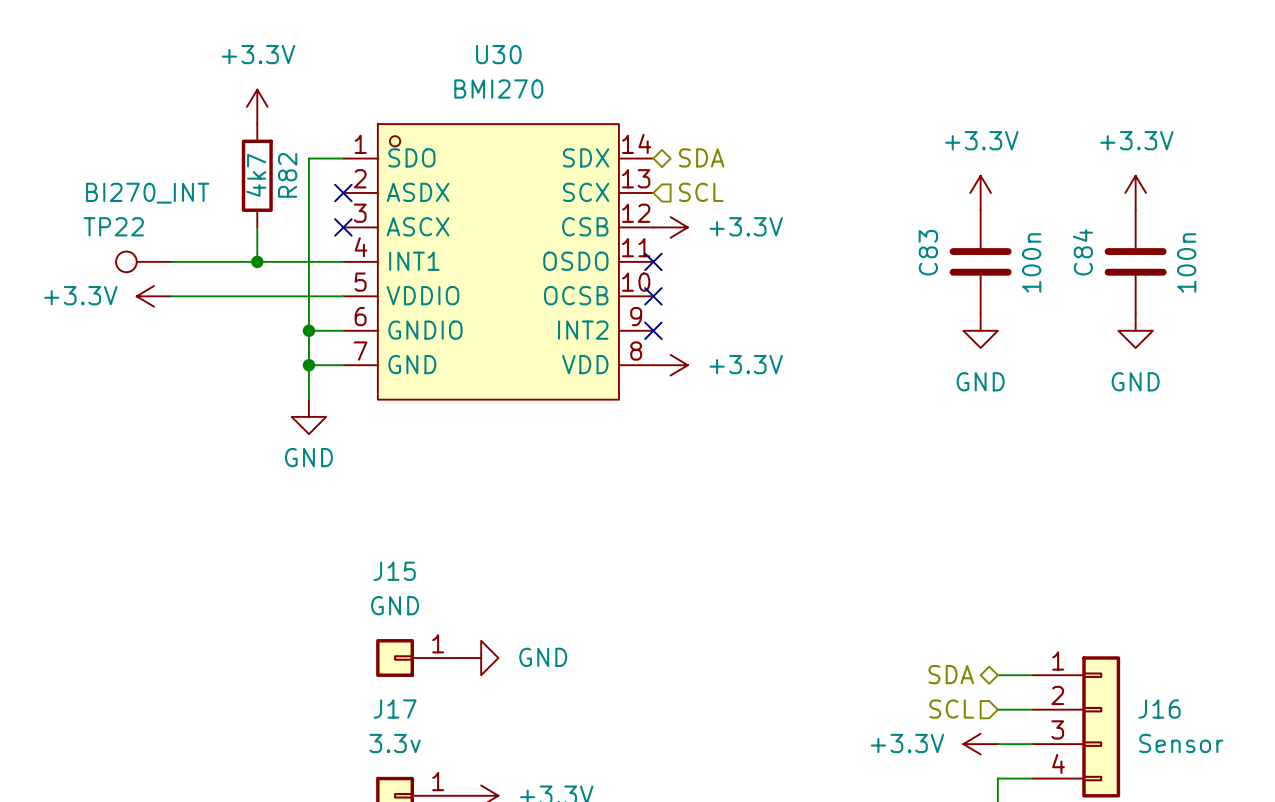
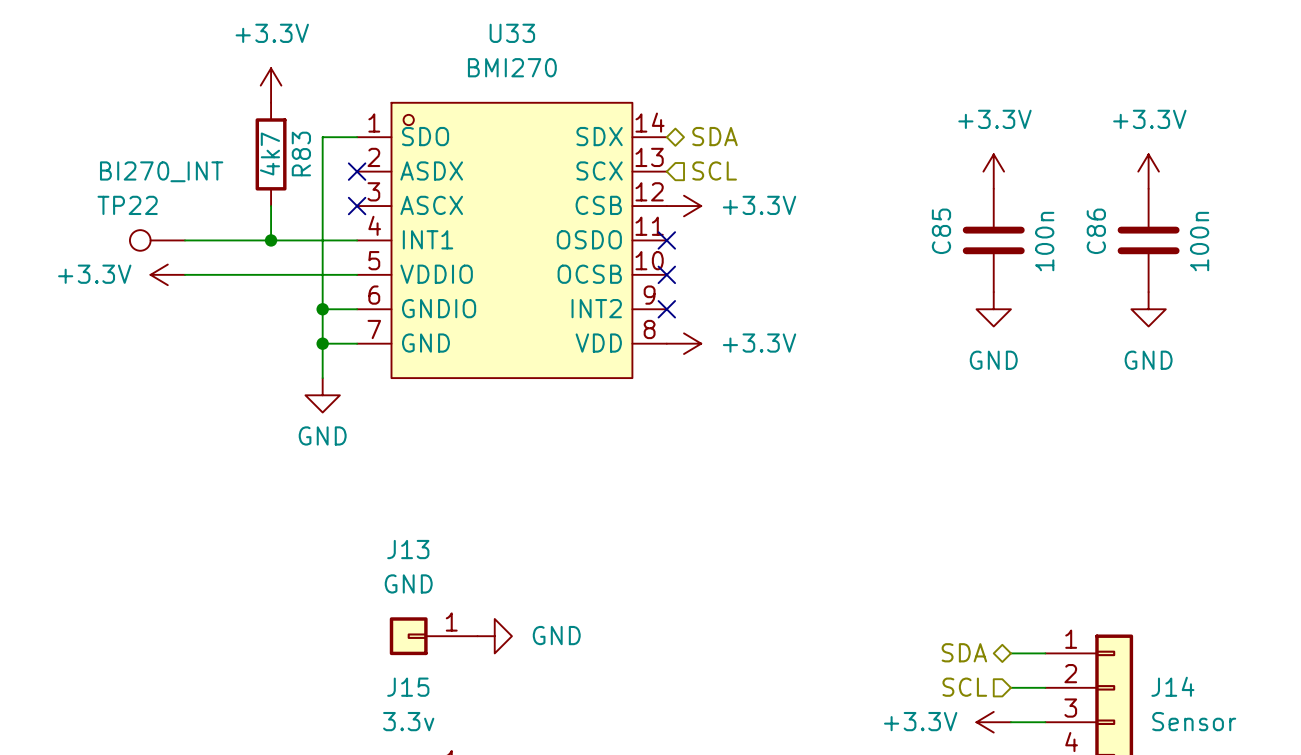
U30 name: U30 (498, 54) -> U33 (512, 33)
R82 name: R82 (287, 175) -> R83 (301, 154)
C83 name: C83 (928, 252) -> C85 (941, 231)
C84 name: C84 (1082, 252) -> C86 (1096, 231)
J15 name: J15 (394, 571) -> J13 (408, 549)
J17 name: J17 (395, 709) -> J15 (408, 687)
J16 name: J16 (1159, 709) -> J14 (1172, 686)

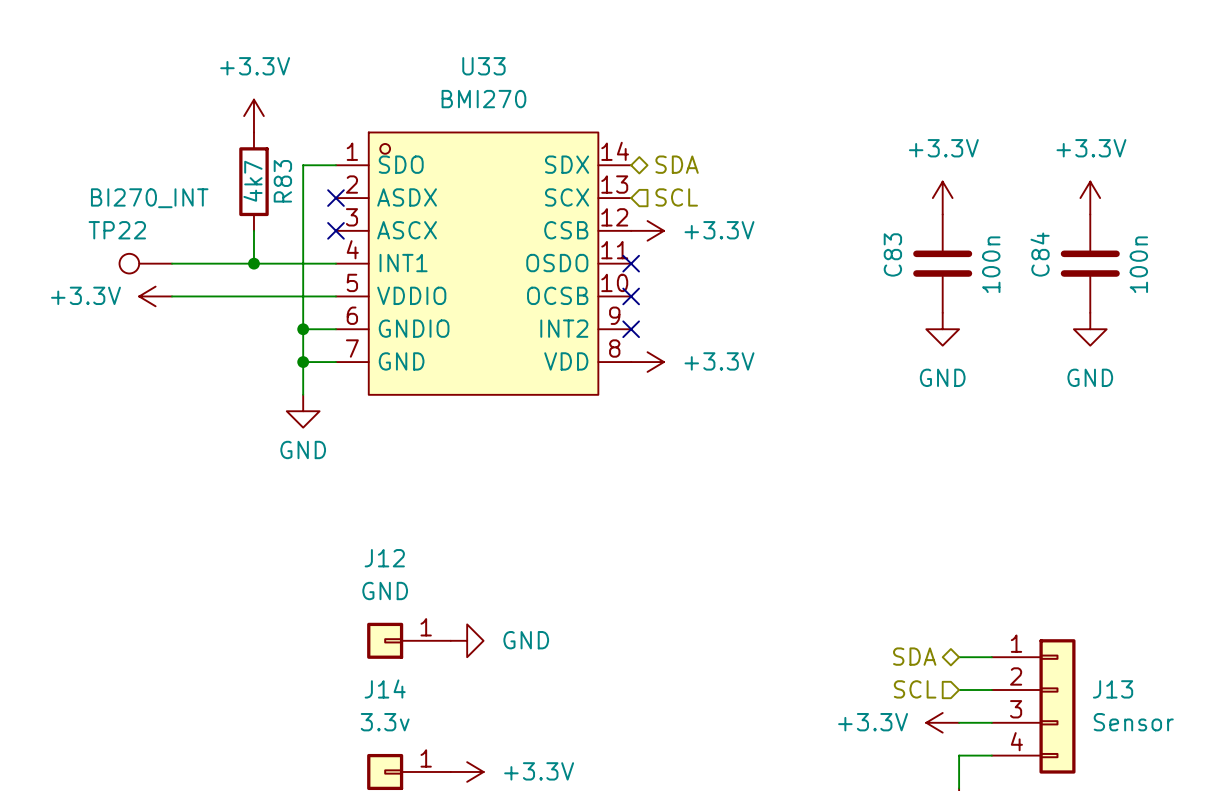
C85 name: C85 (941, 231) -> C83 (892, 254)
C86 name: C86 (1096, 231) -> C84 (1040, 254)
J13 name: J13 (408, 549) -> J12 (384, 558)
J14 name: J14 (1172, 686) -> J13 (1113, 689)
J15 name: J15 (408, 687) -> J14 (385, 689)

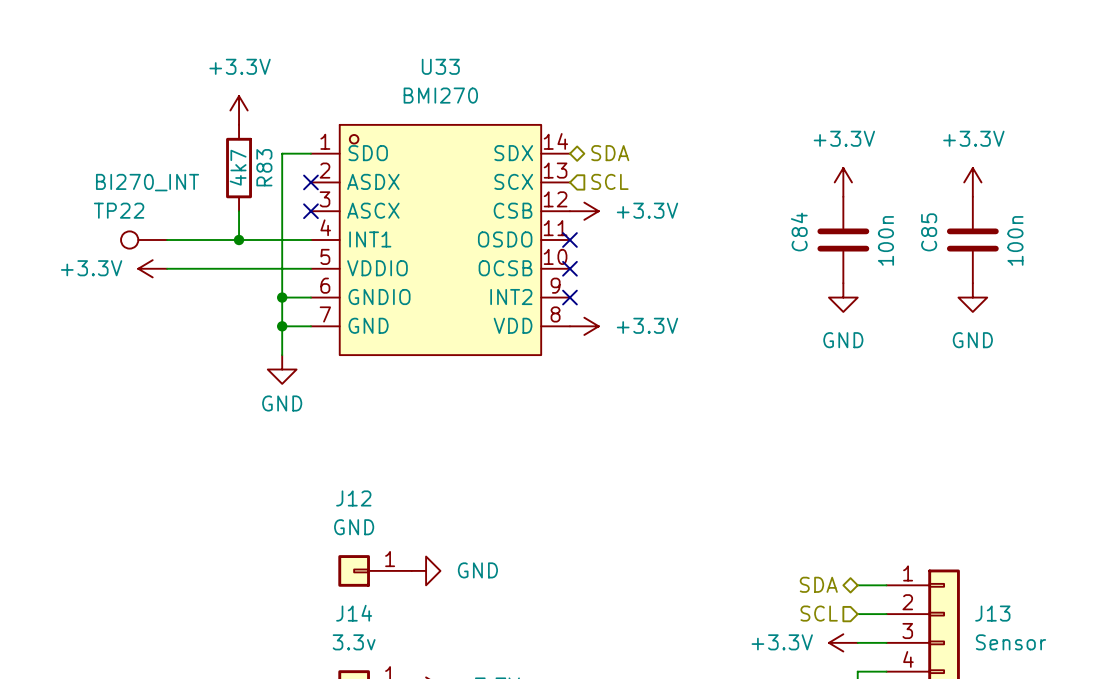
C83 name: C83 (892, 254) -> C84 (799, 232)
C84 name: C84 (1040, 254) -> C85 (929, 232)

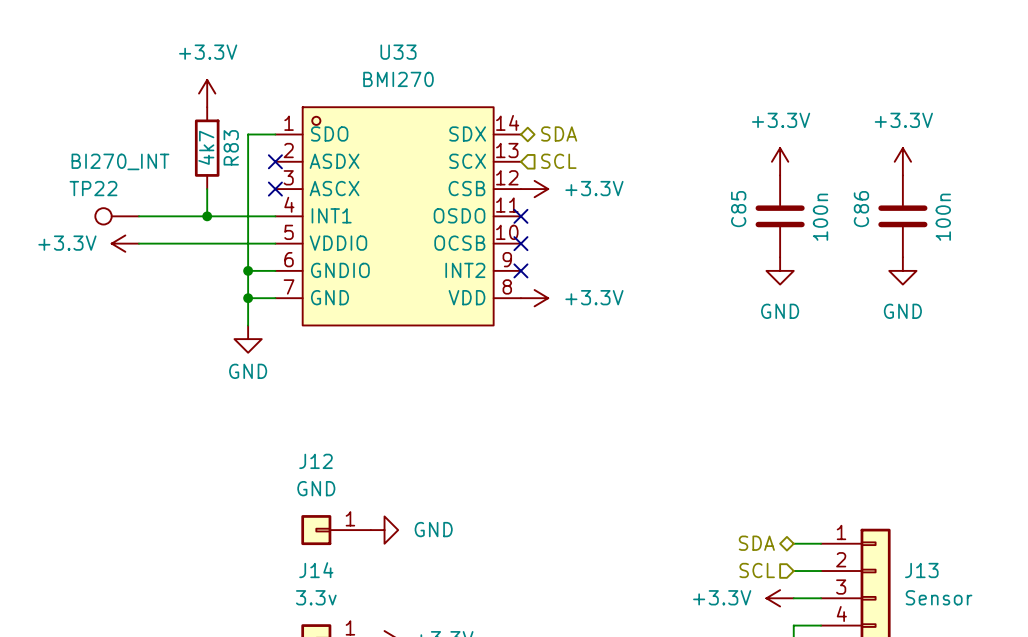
C84 name: C84 (799, 232) -> C85 (738, 209)
C85 name: C85 (929, 232) -> C86 (861, 209)

